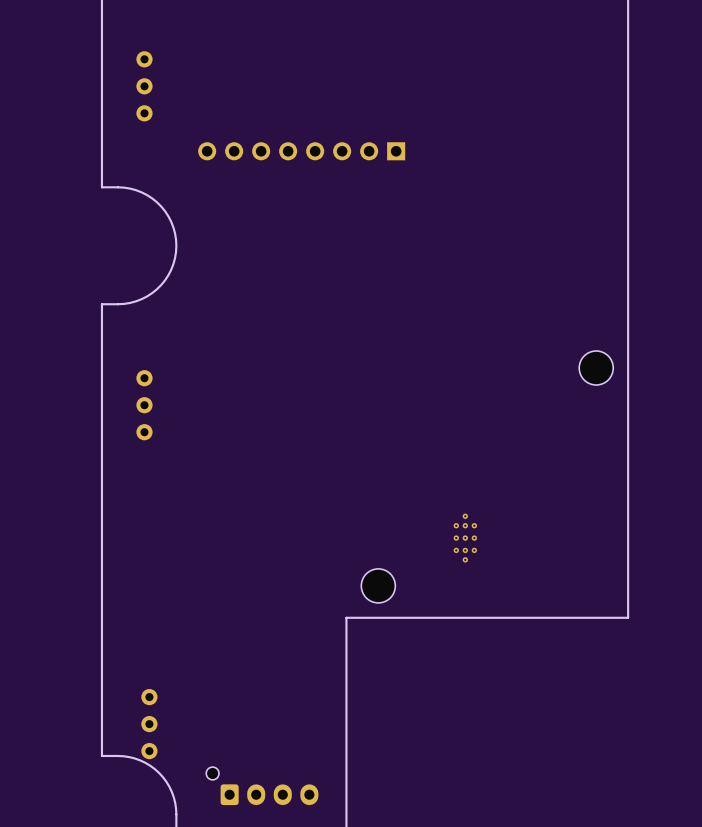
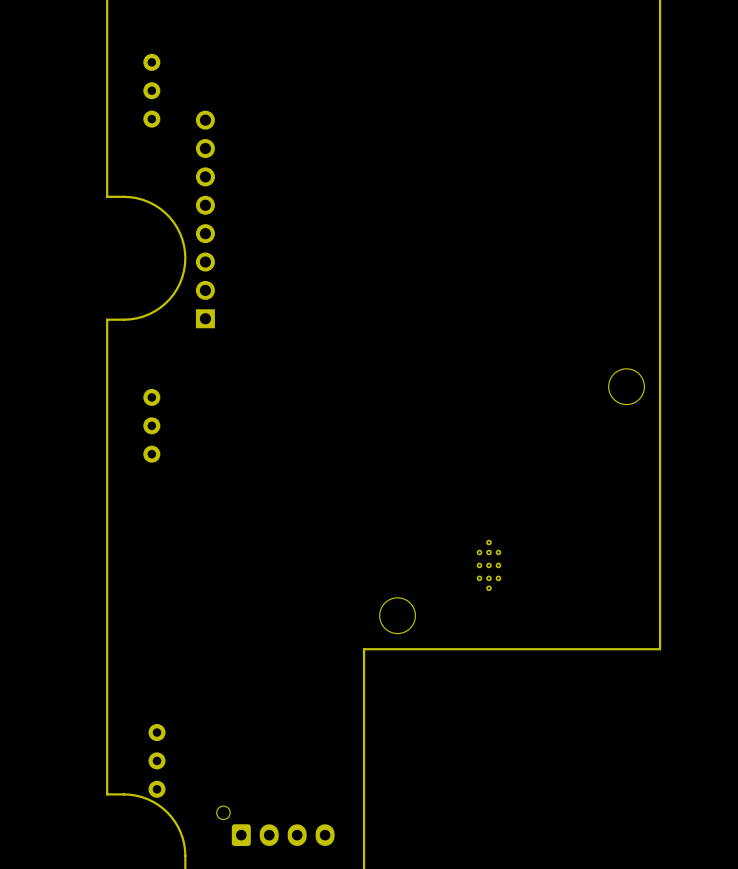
part rotation: 0° (301, 151) -> 90° clockwise (205, 219)

